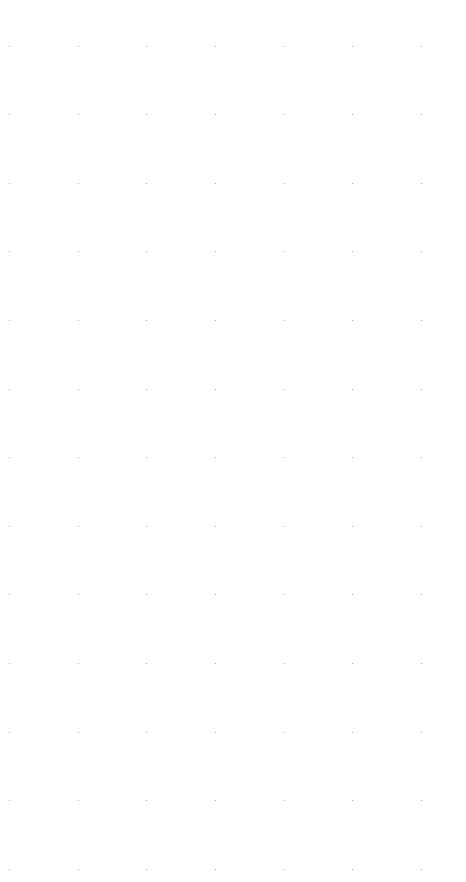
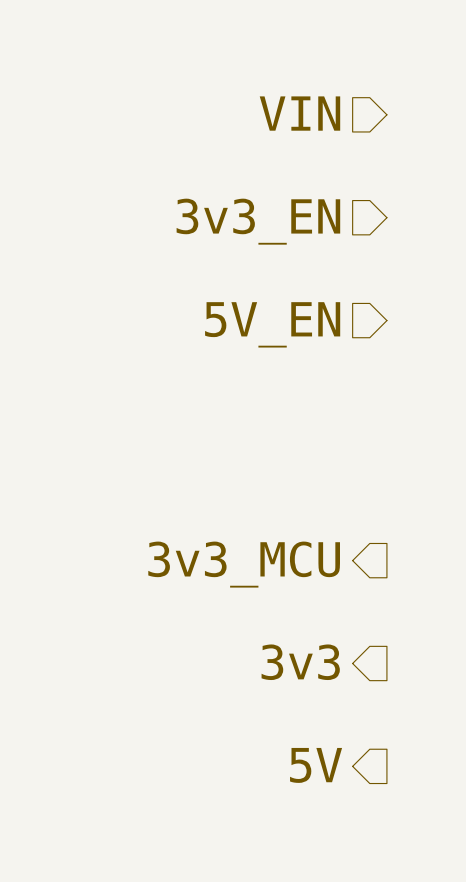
hierarchical label: none -> VIN (299, 113)
hierarchical label: none -> 3v3_EN (258, 221)
hierarchical label: none -> 5V_EN (272, 324)
hierarchical label: none -> 3v3_MCU (244, 564)
hierarchical label: none -> 3v3 (300, 662)
hierarchical label: none -> 5V (316, 765)

